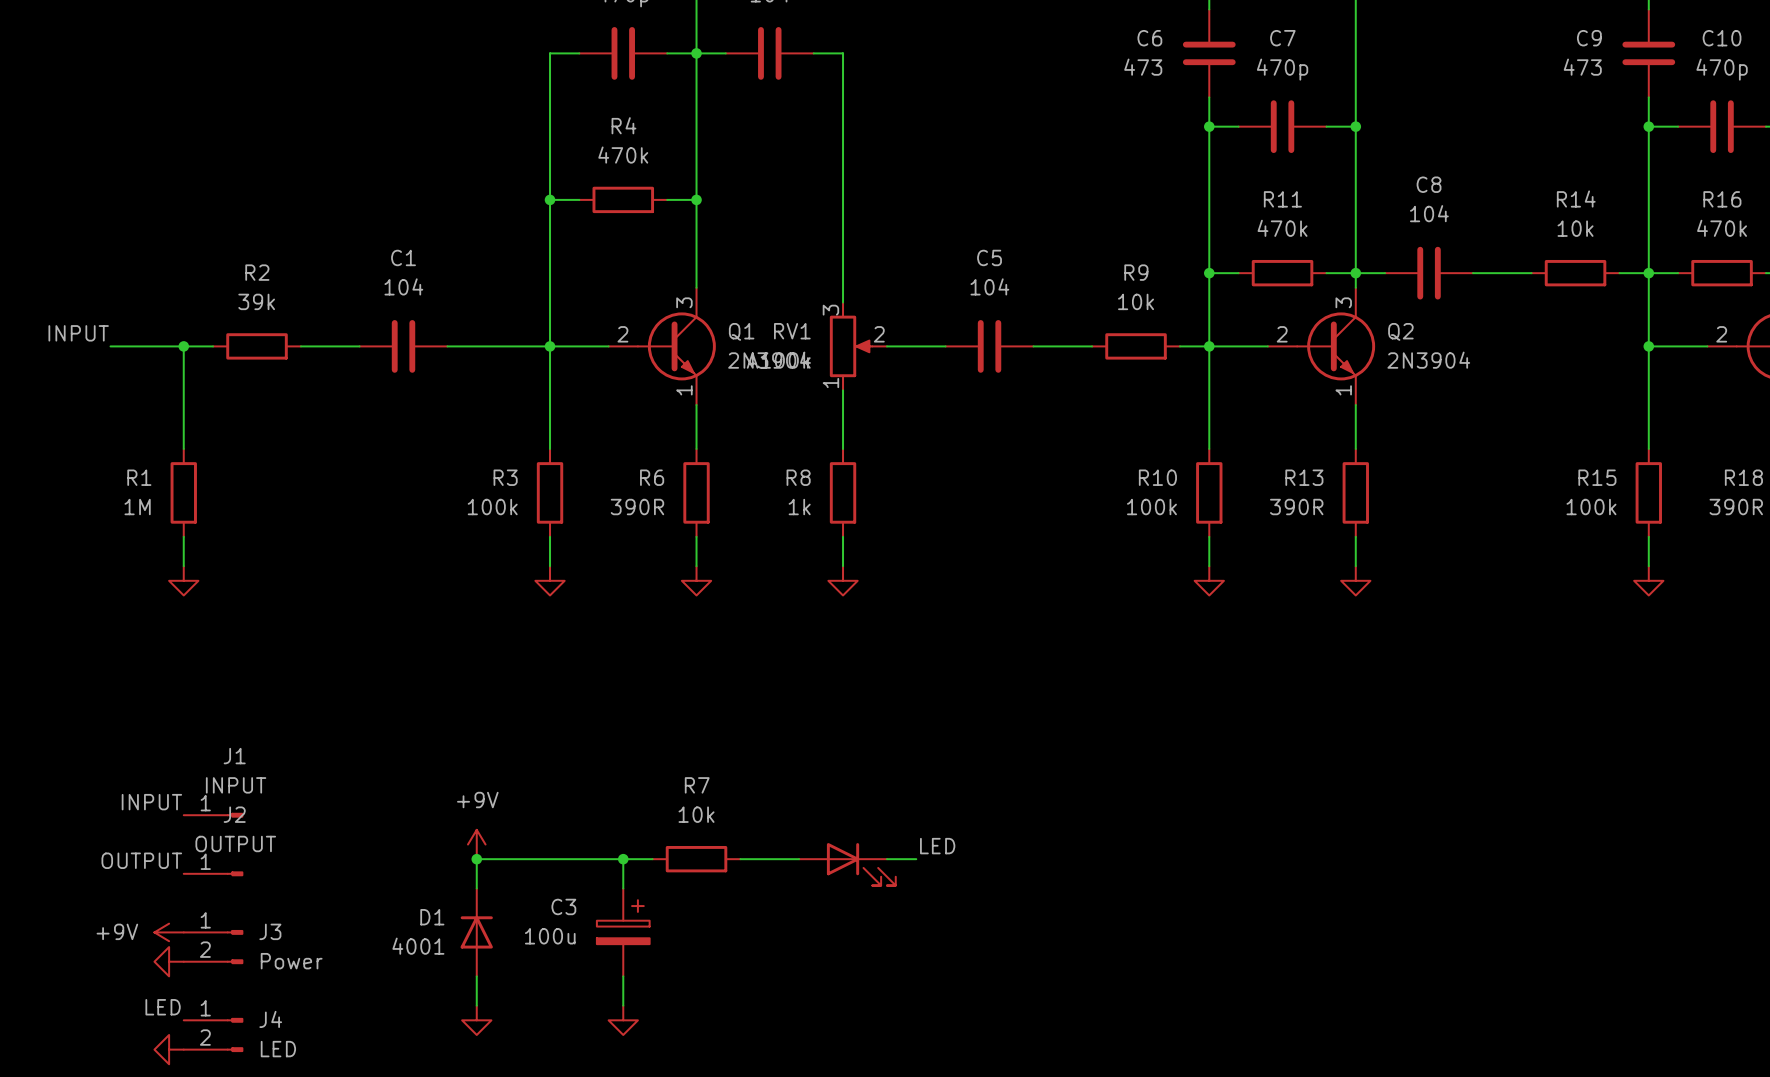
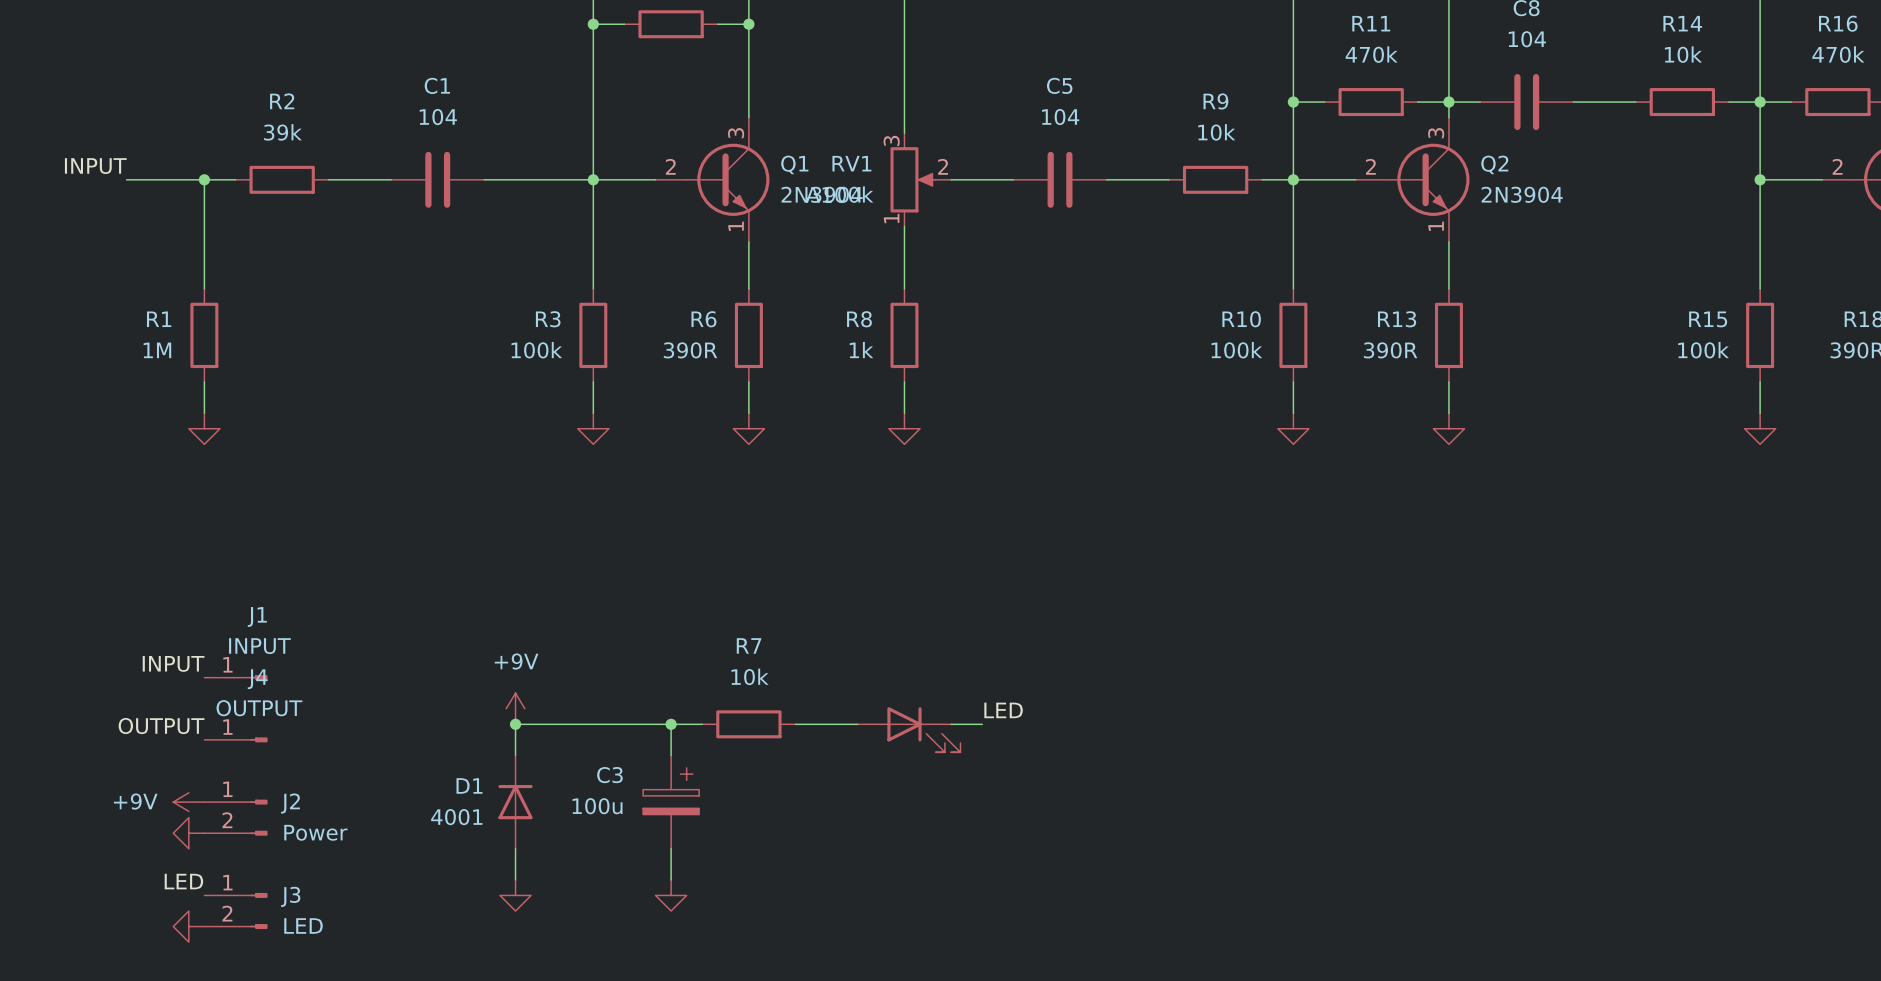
J2 name: J2 (234, 814) -> J4 (257, 679)
J3 name: J3 (270, 931) -> J2 (290, 803)
J4 name: J4 (270, 1019) -> J3 (290, 896)

